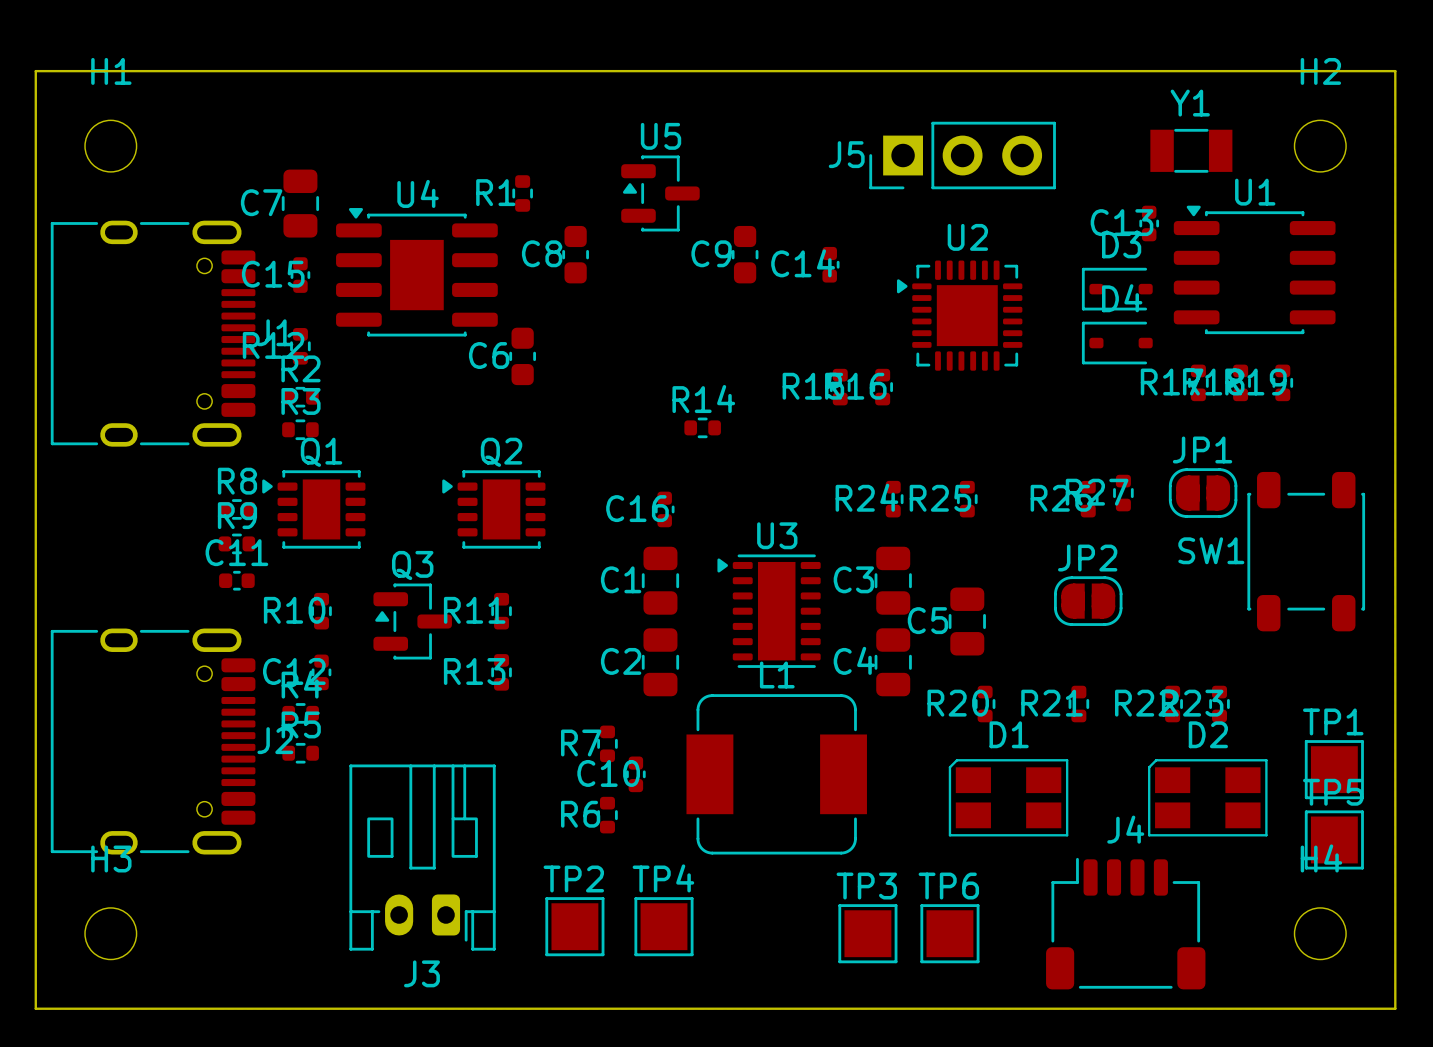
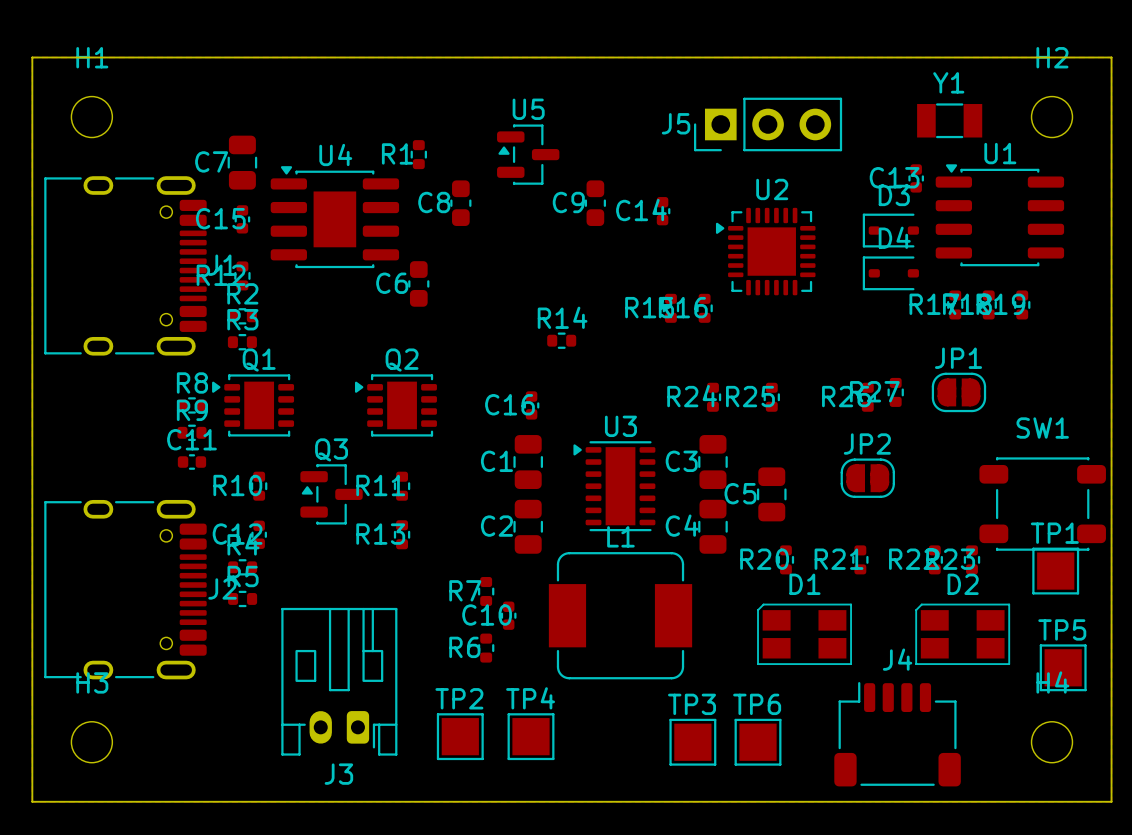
SW1 rotation: 0° (1306, 551) -> 90° clockwise (1042, 504)
TP1 position: (1334, 769) -> (1055, 571)

